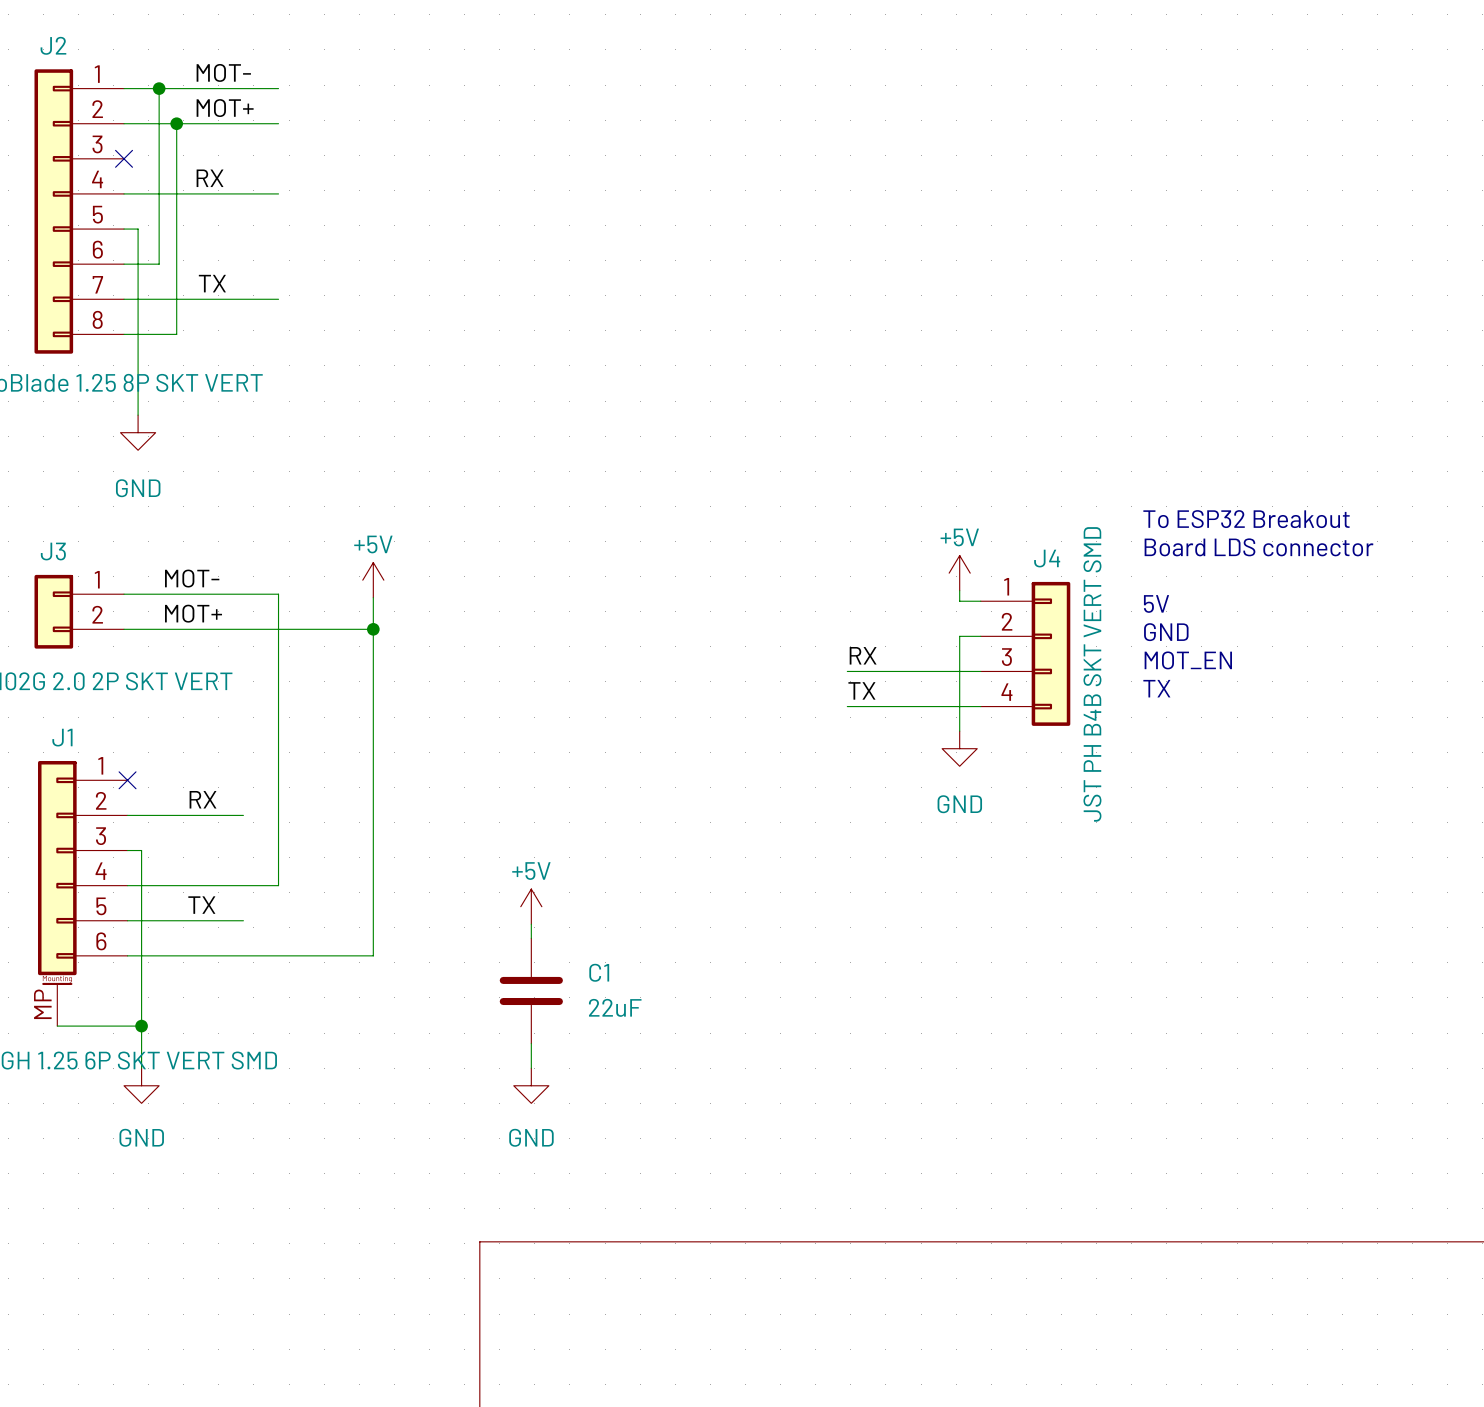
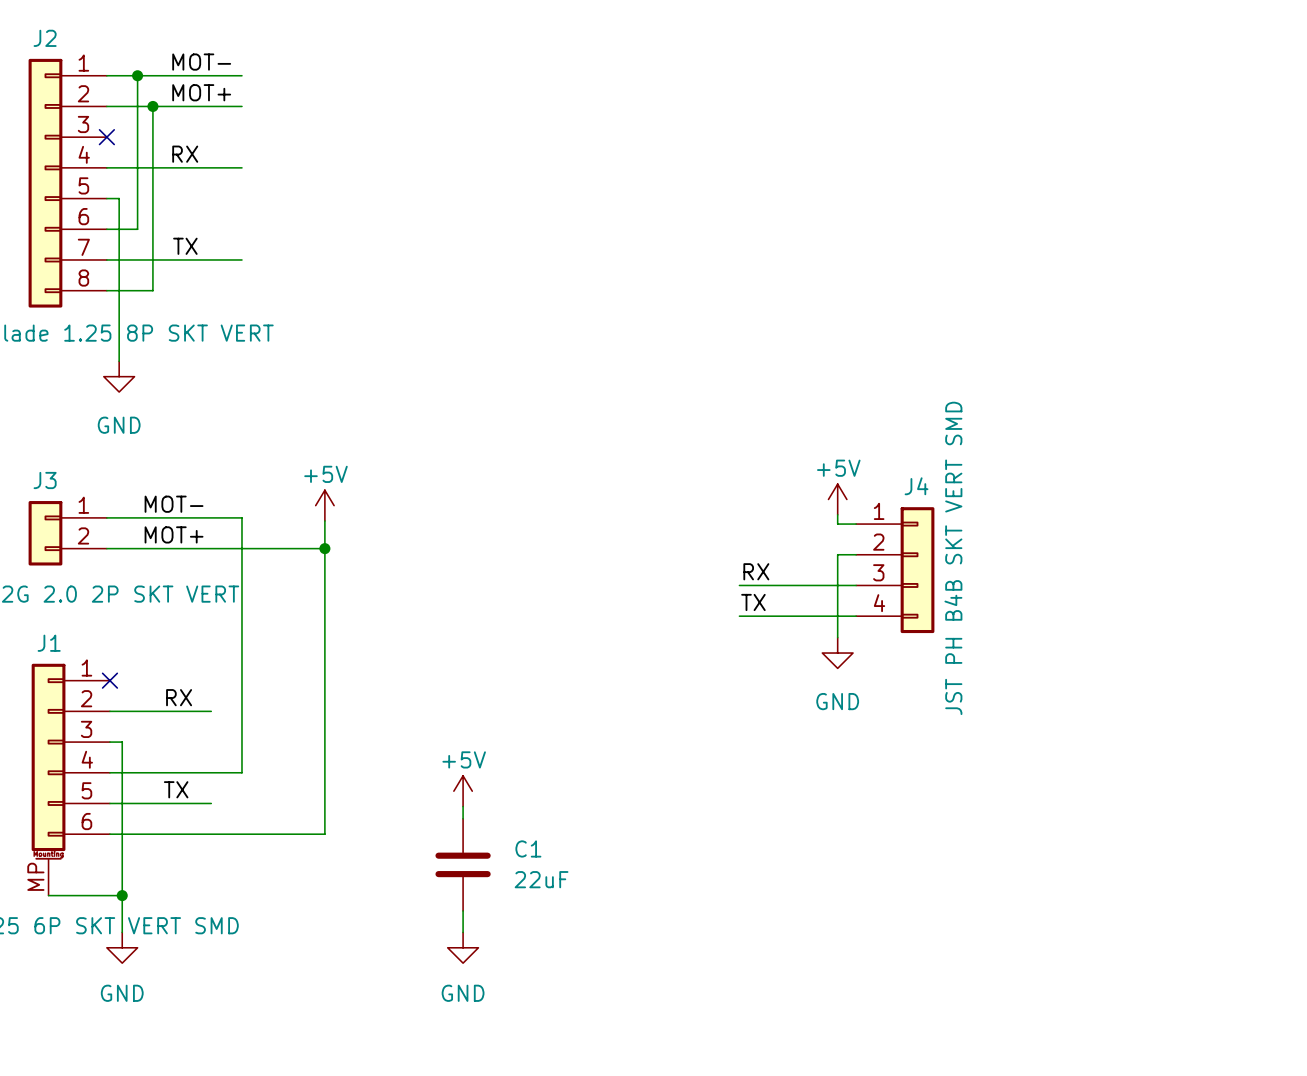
text: To ESP32 Breakout (1246, 519) -> none
text: Board LDS connector (1259, 547) -> none
text: 5V (1156, 603) -> none
text: GND (1166, 632) -> none
text: MOT_EN (1188, 660) -> none
text: TX (1156, 688) -> none

